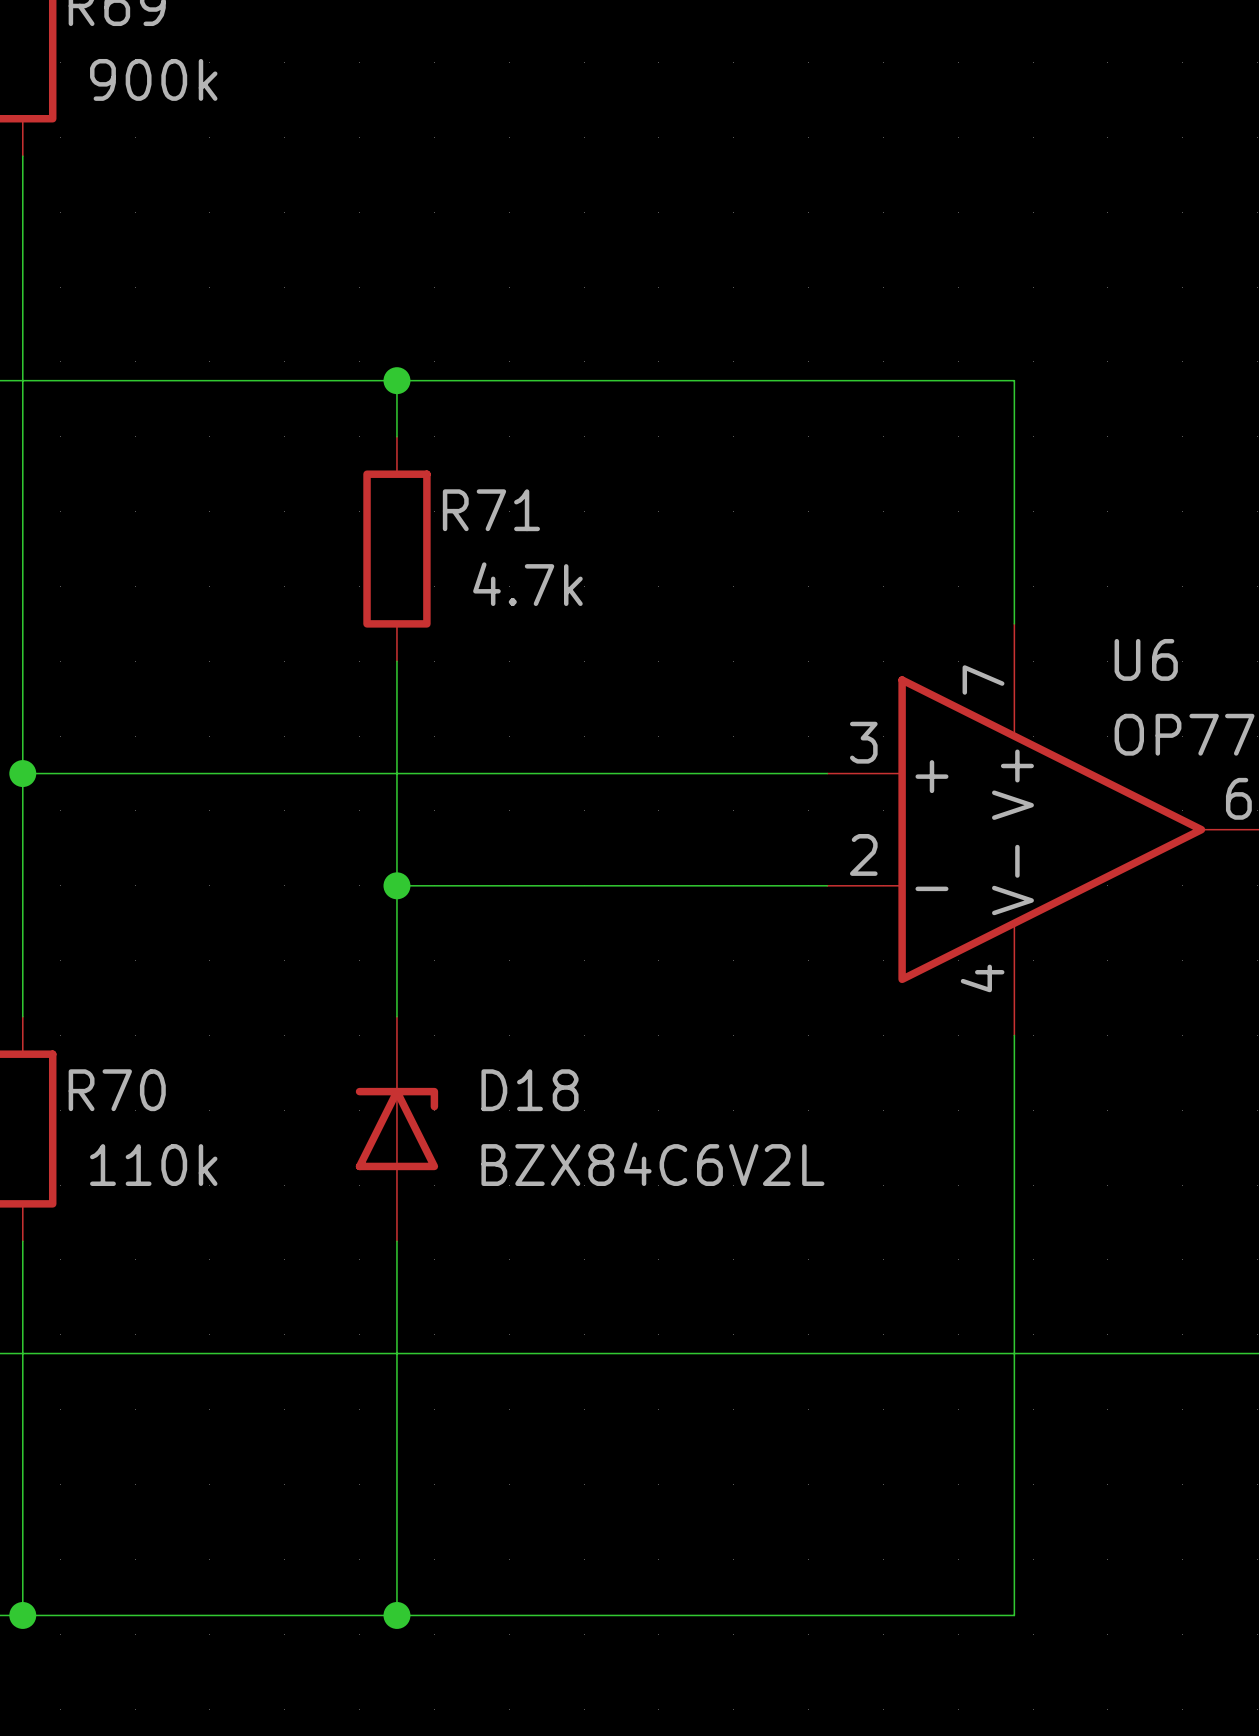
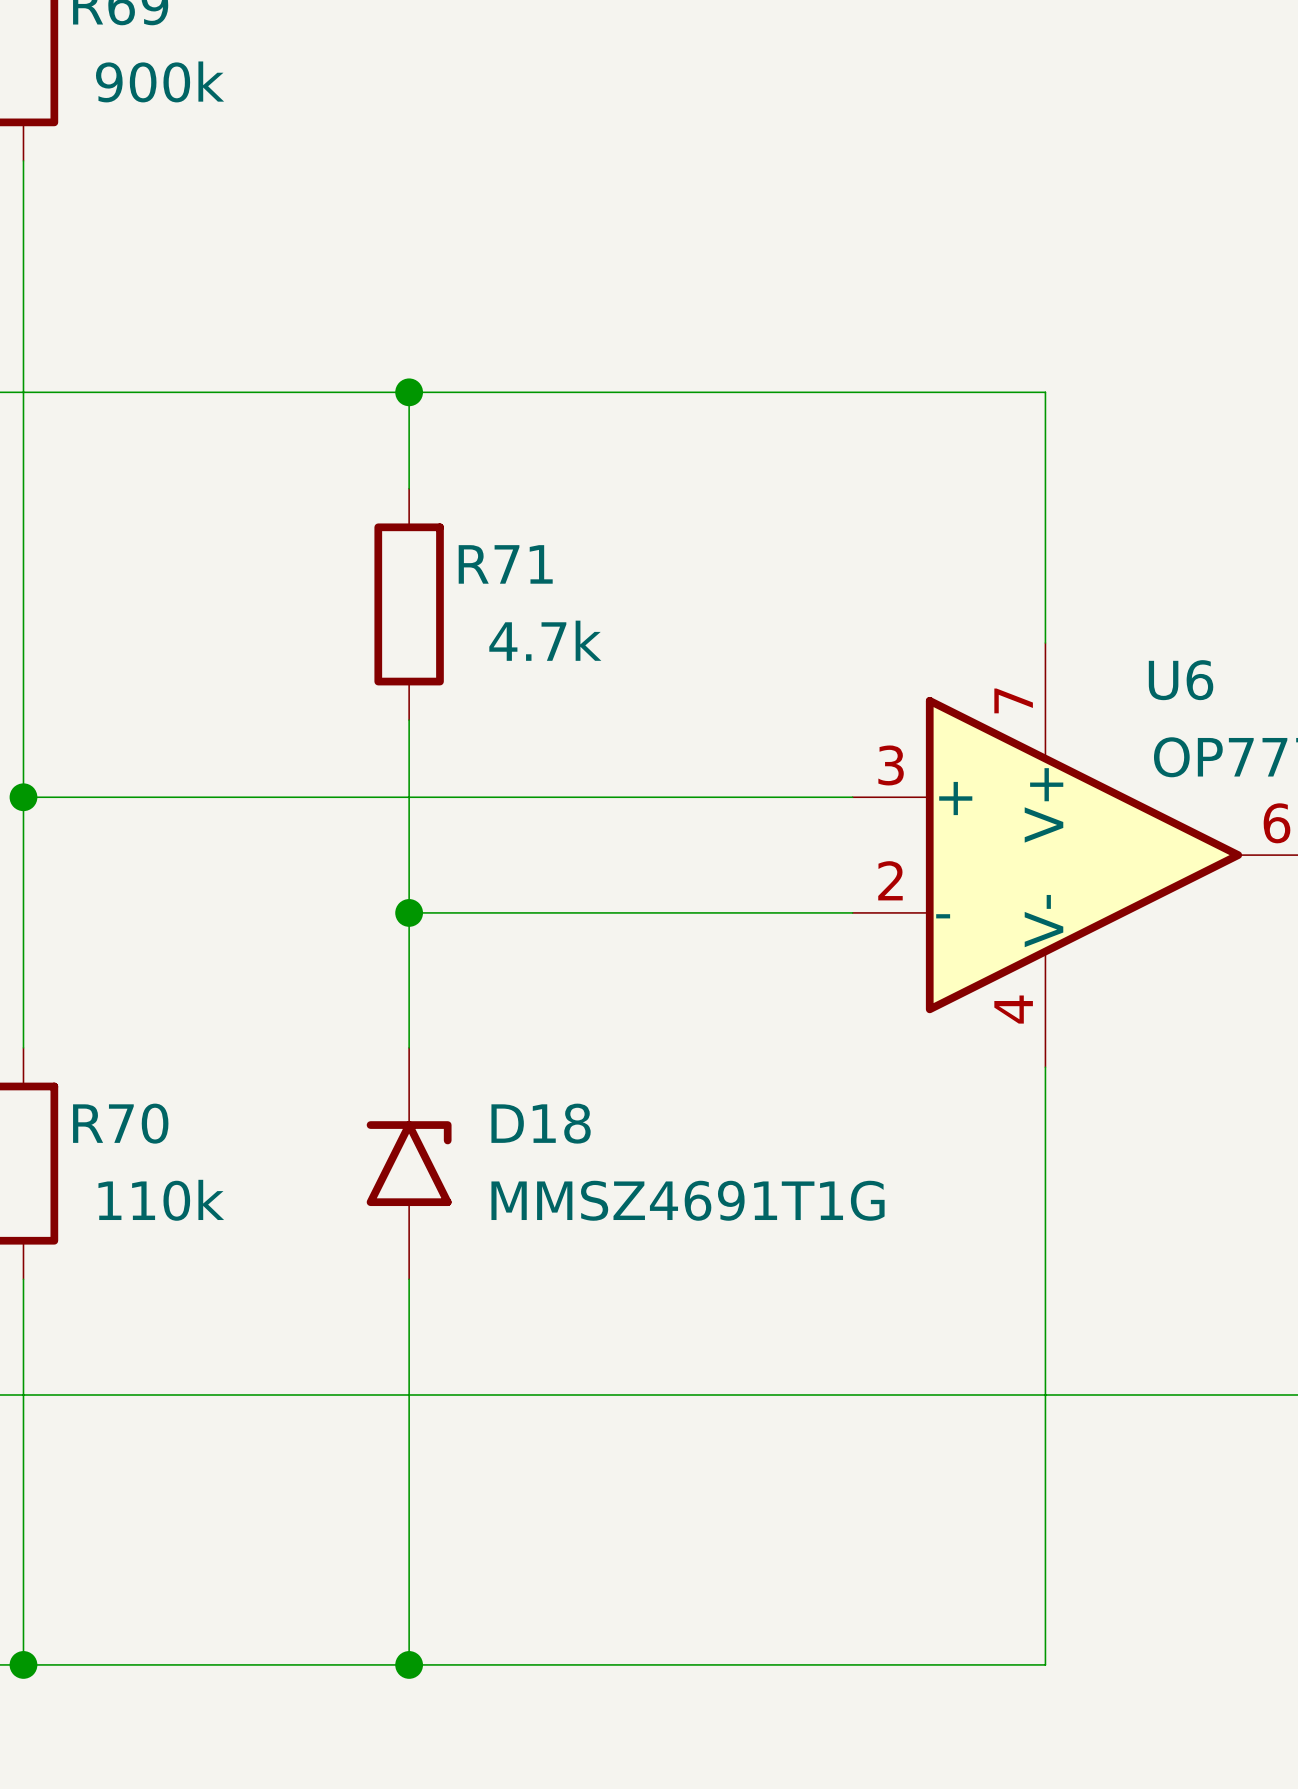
R71 position: (396, 549) -> (409, 604)
D18 symbol: [355, 1016, 439, 1242] -> [366, 1047, 452, 1280]
D18 value: BZX84C6V2L (652, 1164) -> MMSZ4691T1G (688, 1200)

